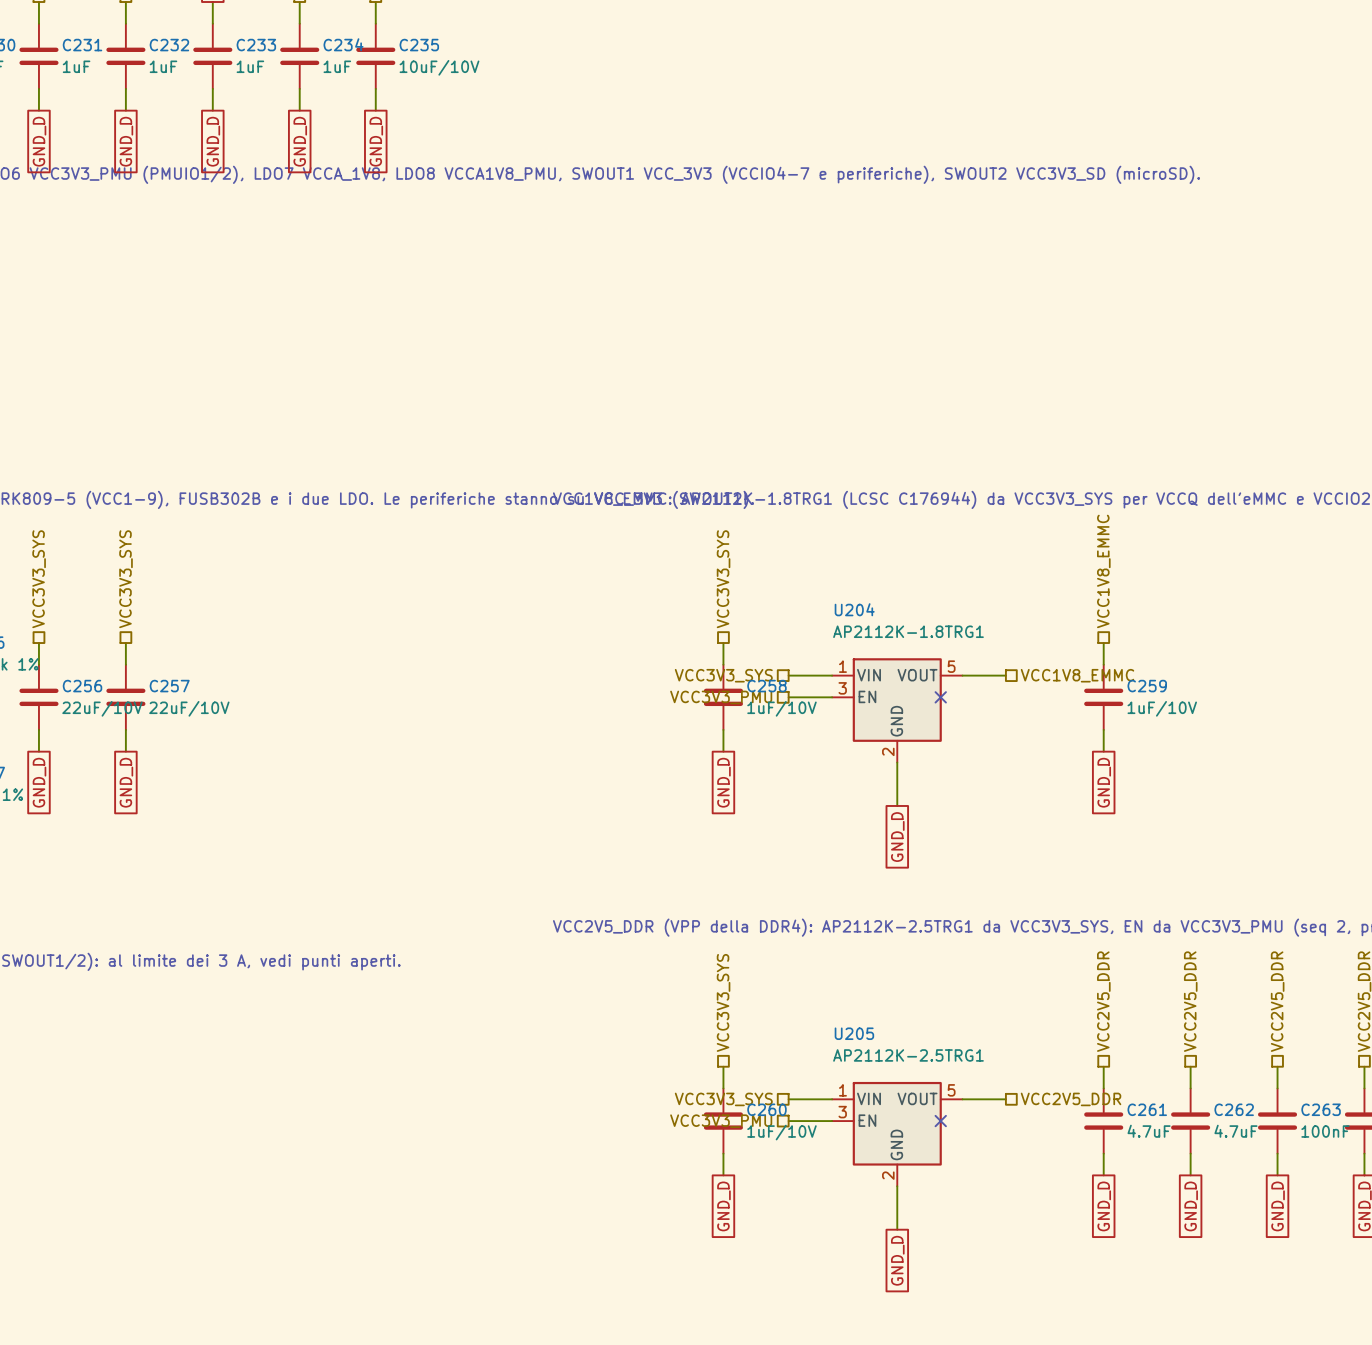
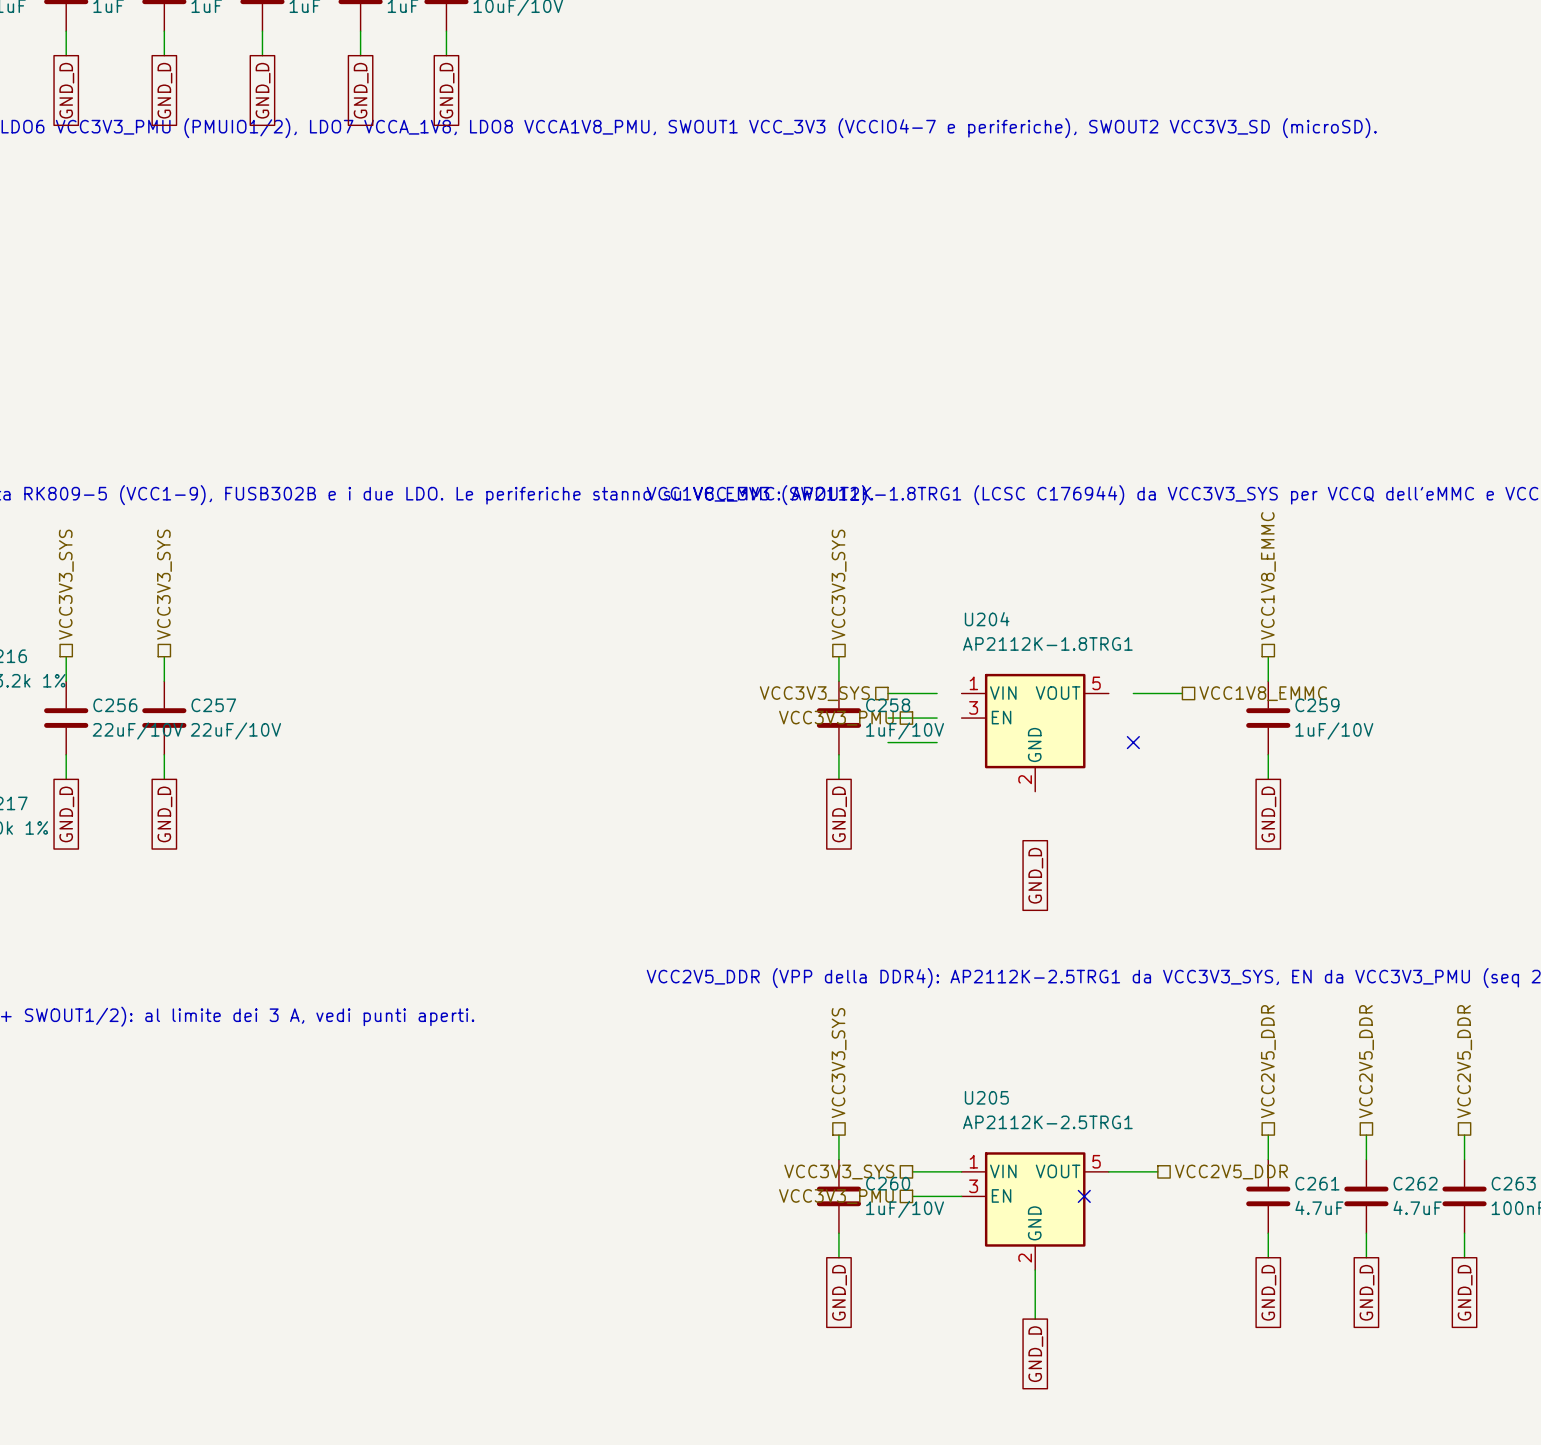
hierarchical label position: VCC3V3_SYS (723, 675) -> VCC3V3_SYS (814, 693)
wire: (810, 675) (832, 675) -> (888, 693) (912, 693)
wire: (962, 675) (984, 675) -> (1157, 693) (1182, 693)
hierarchical label position: VCC1V8_EMMC (1077, 675) -> VCC1V8_EMMC (1263, 693)
wire: (810, 697) (832, 697) -> (888, 718) (912, 718)
no-connect mark position: (940, 697) -> (1133, 742)
wire: none -> (888, 742) (937, 742)
wire: (897, 762) (897, 805) -> none

